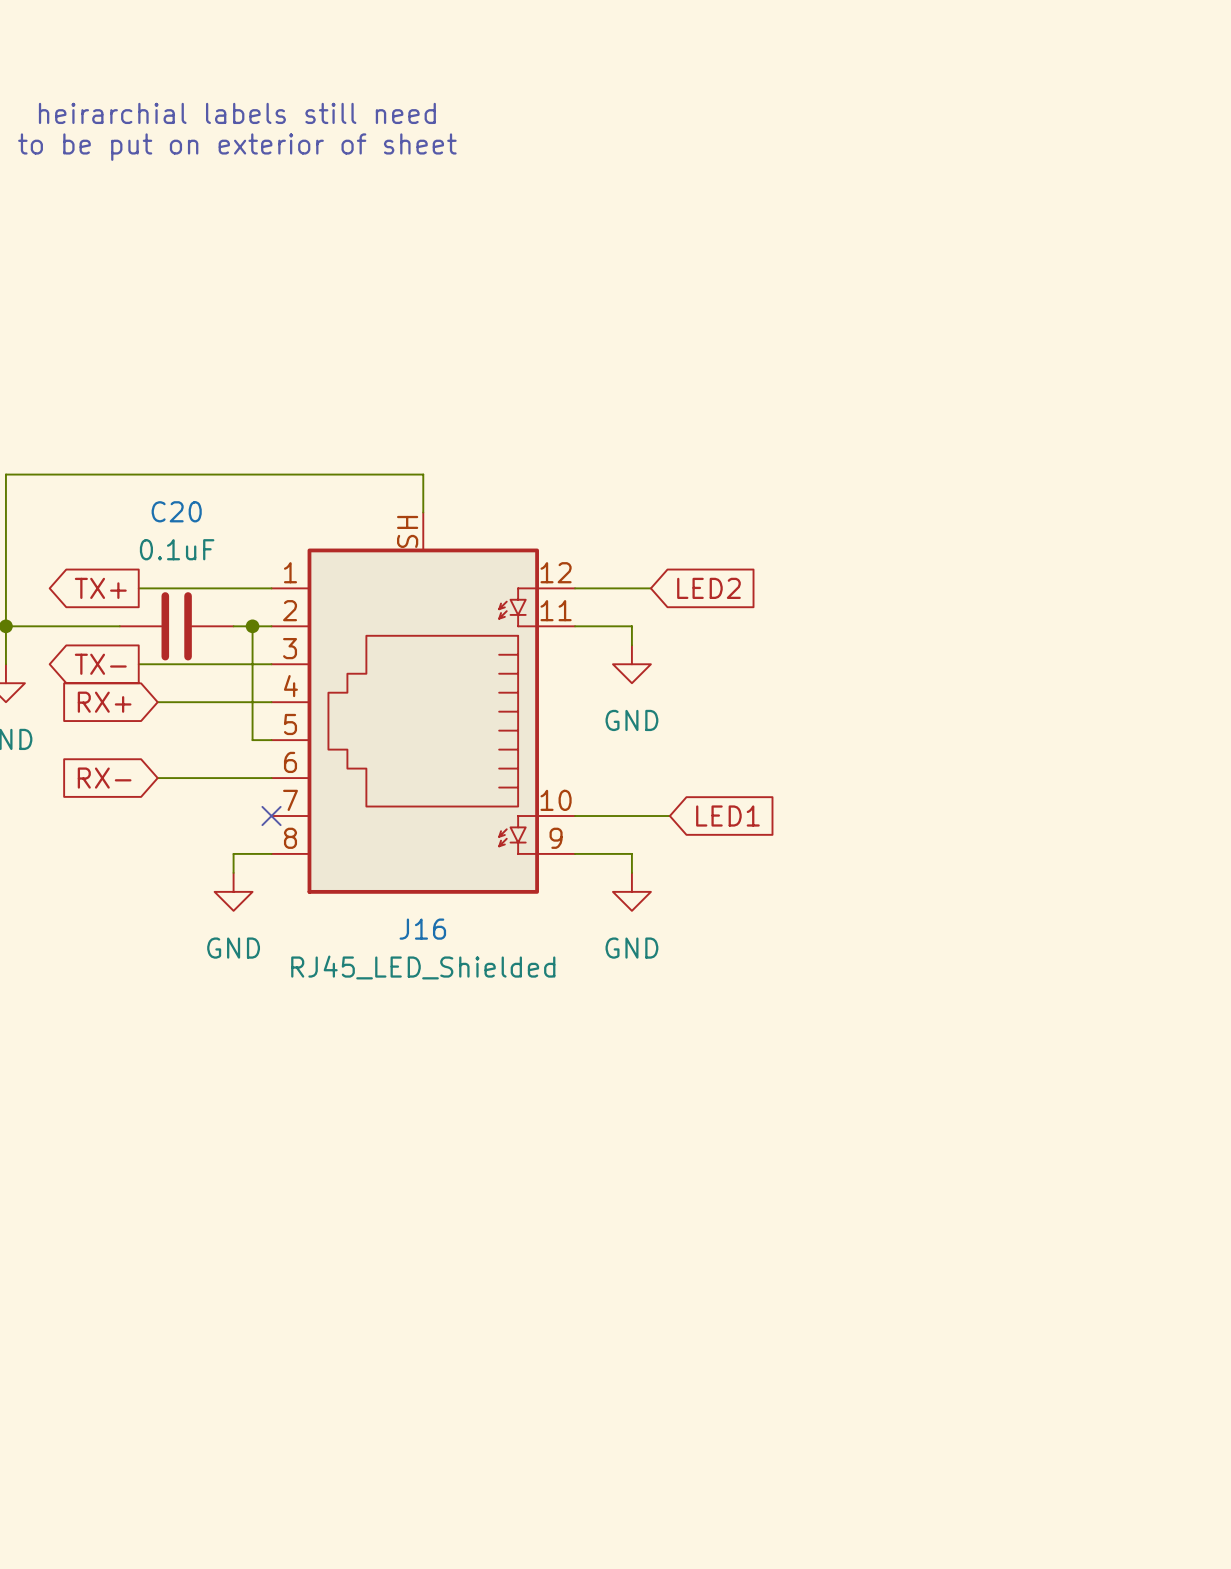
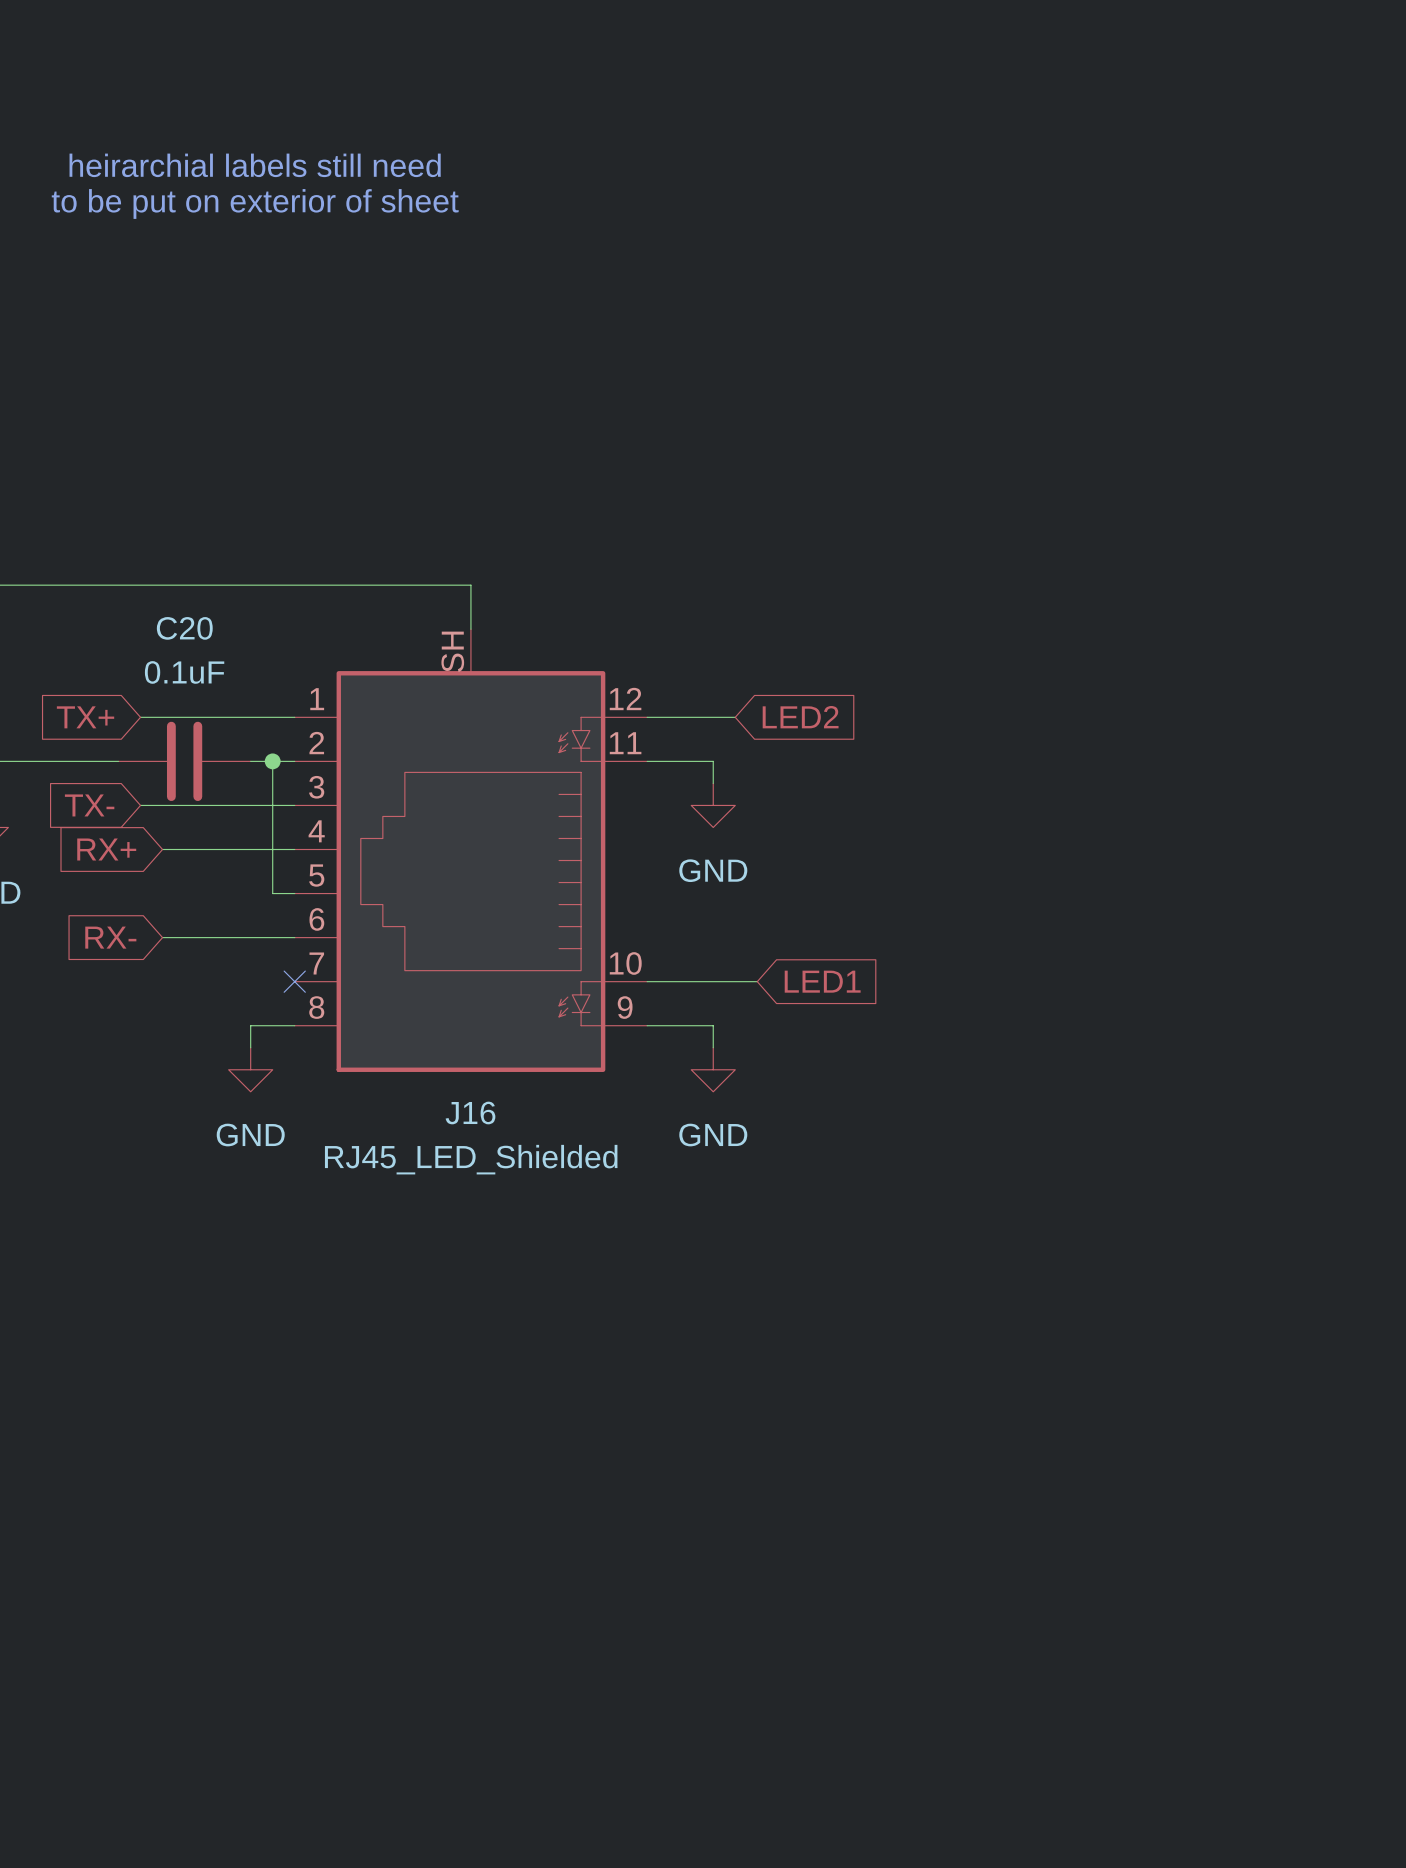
global label shape: output (100, 588) -> input (85, 717)
global label shape: output (100, 664) -> input (89, 805)

